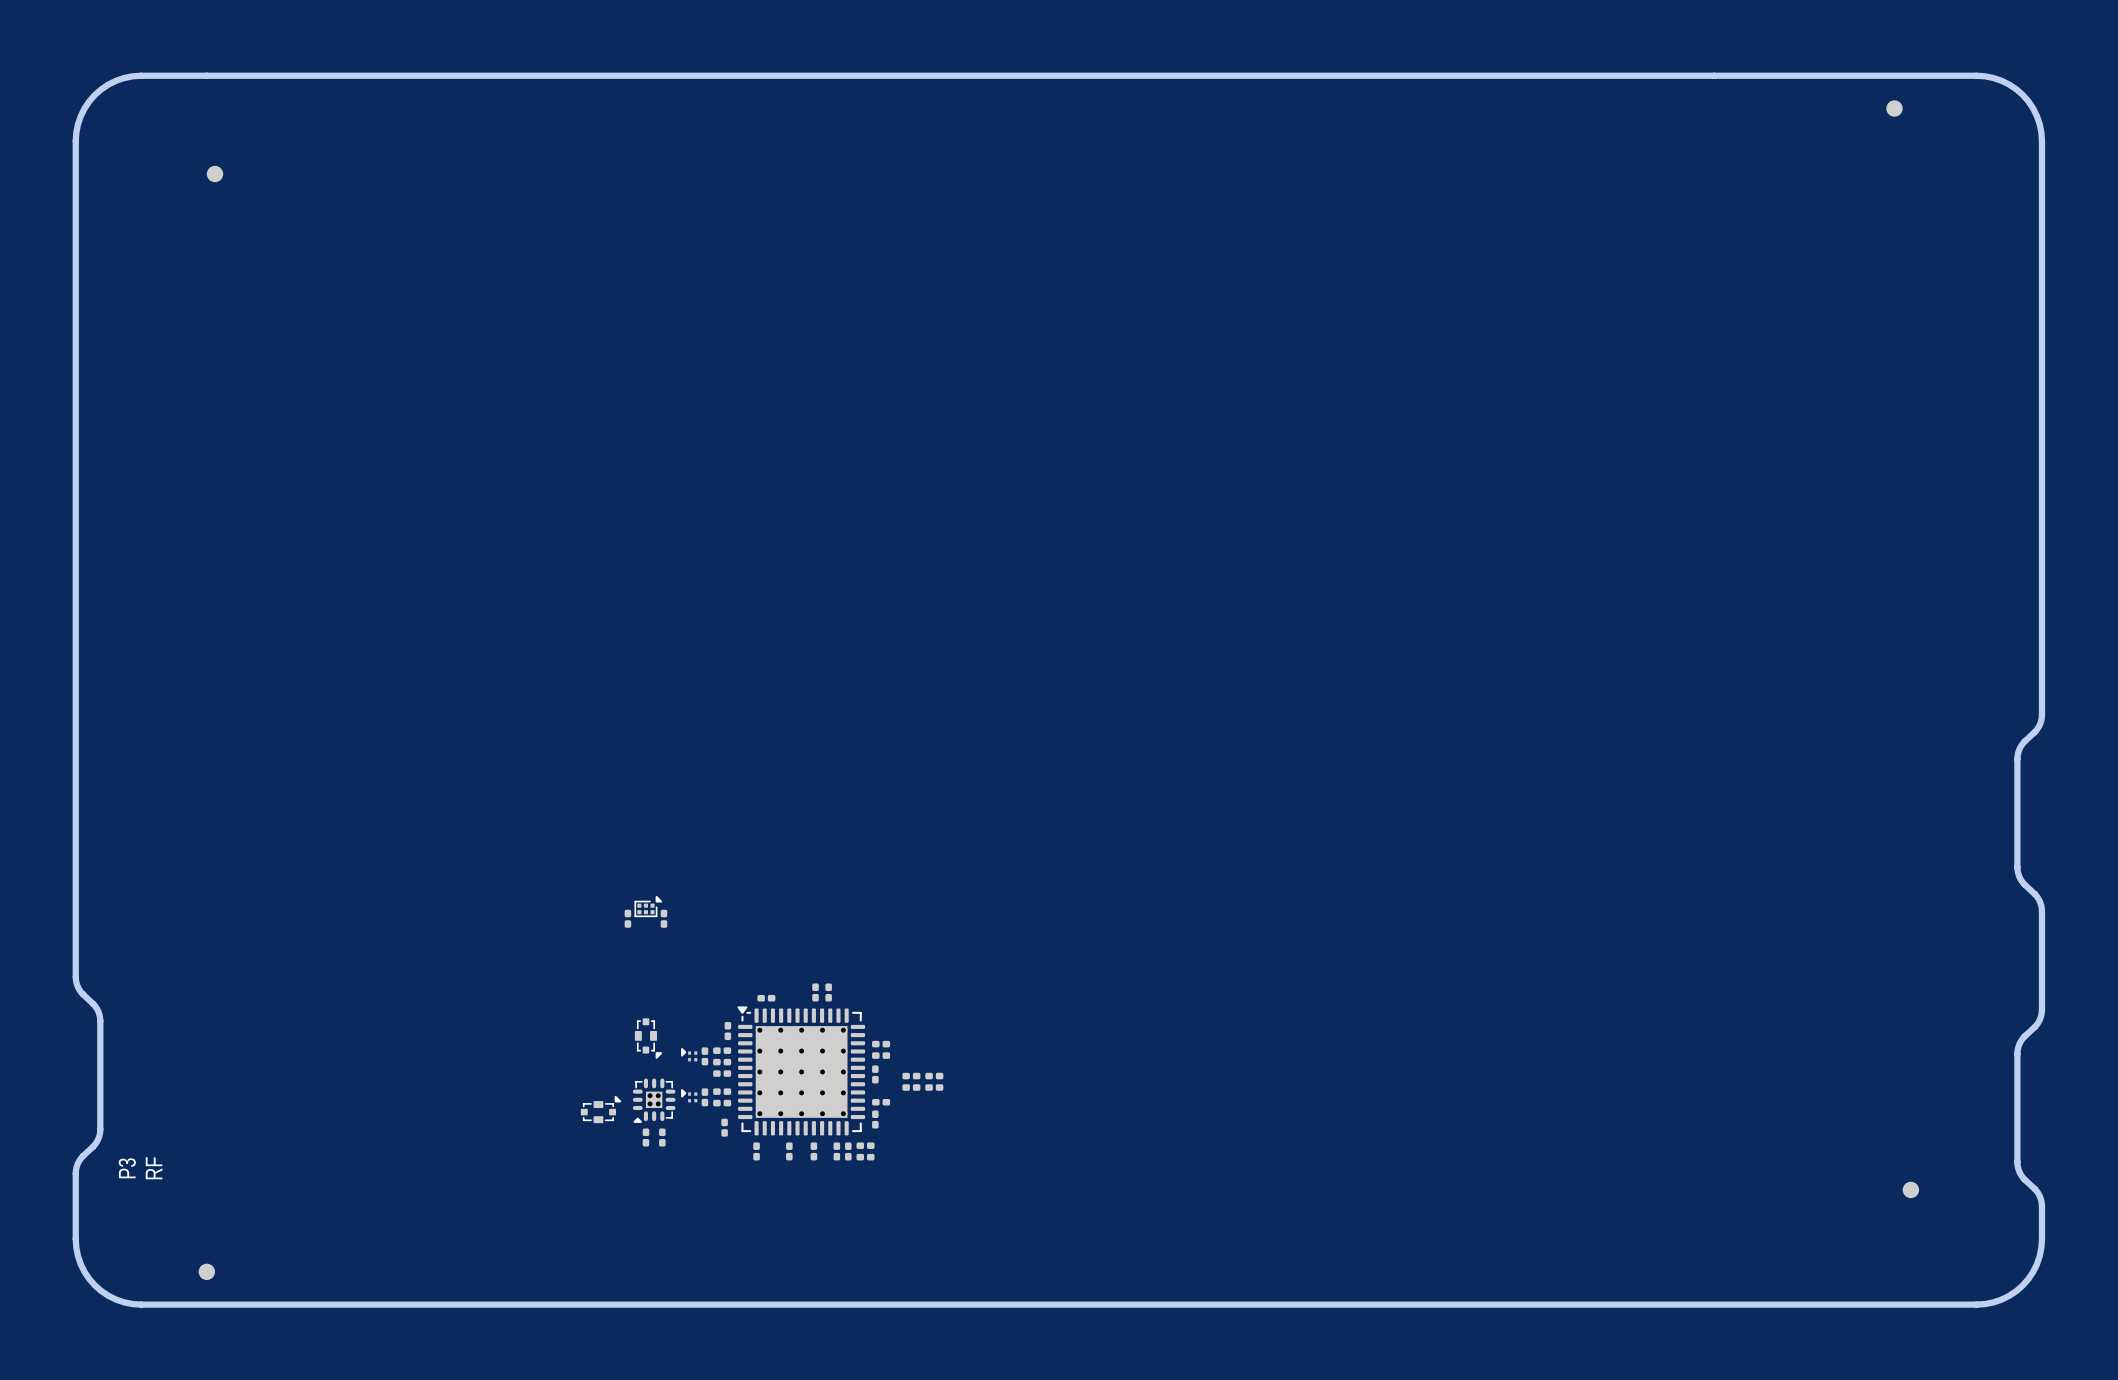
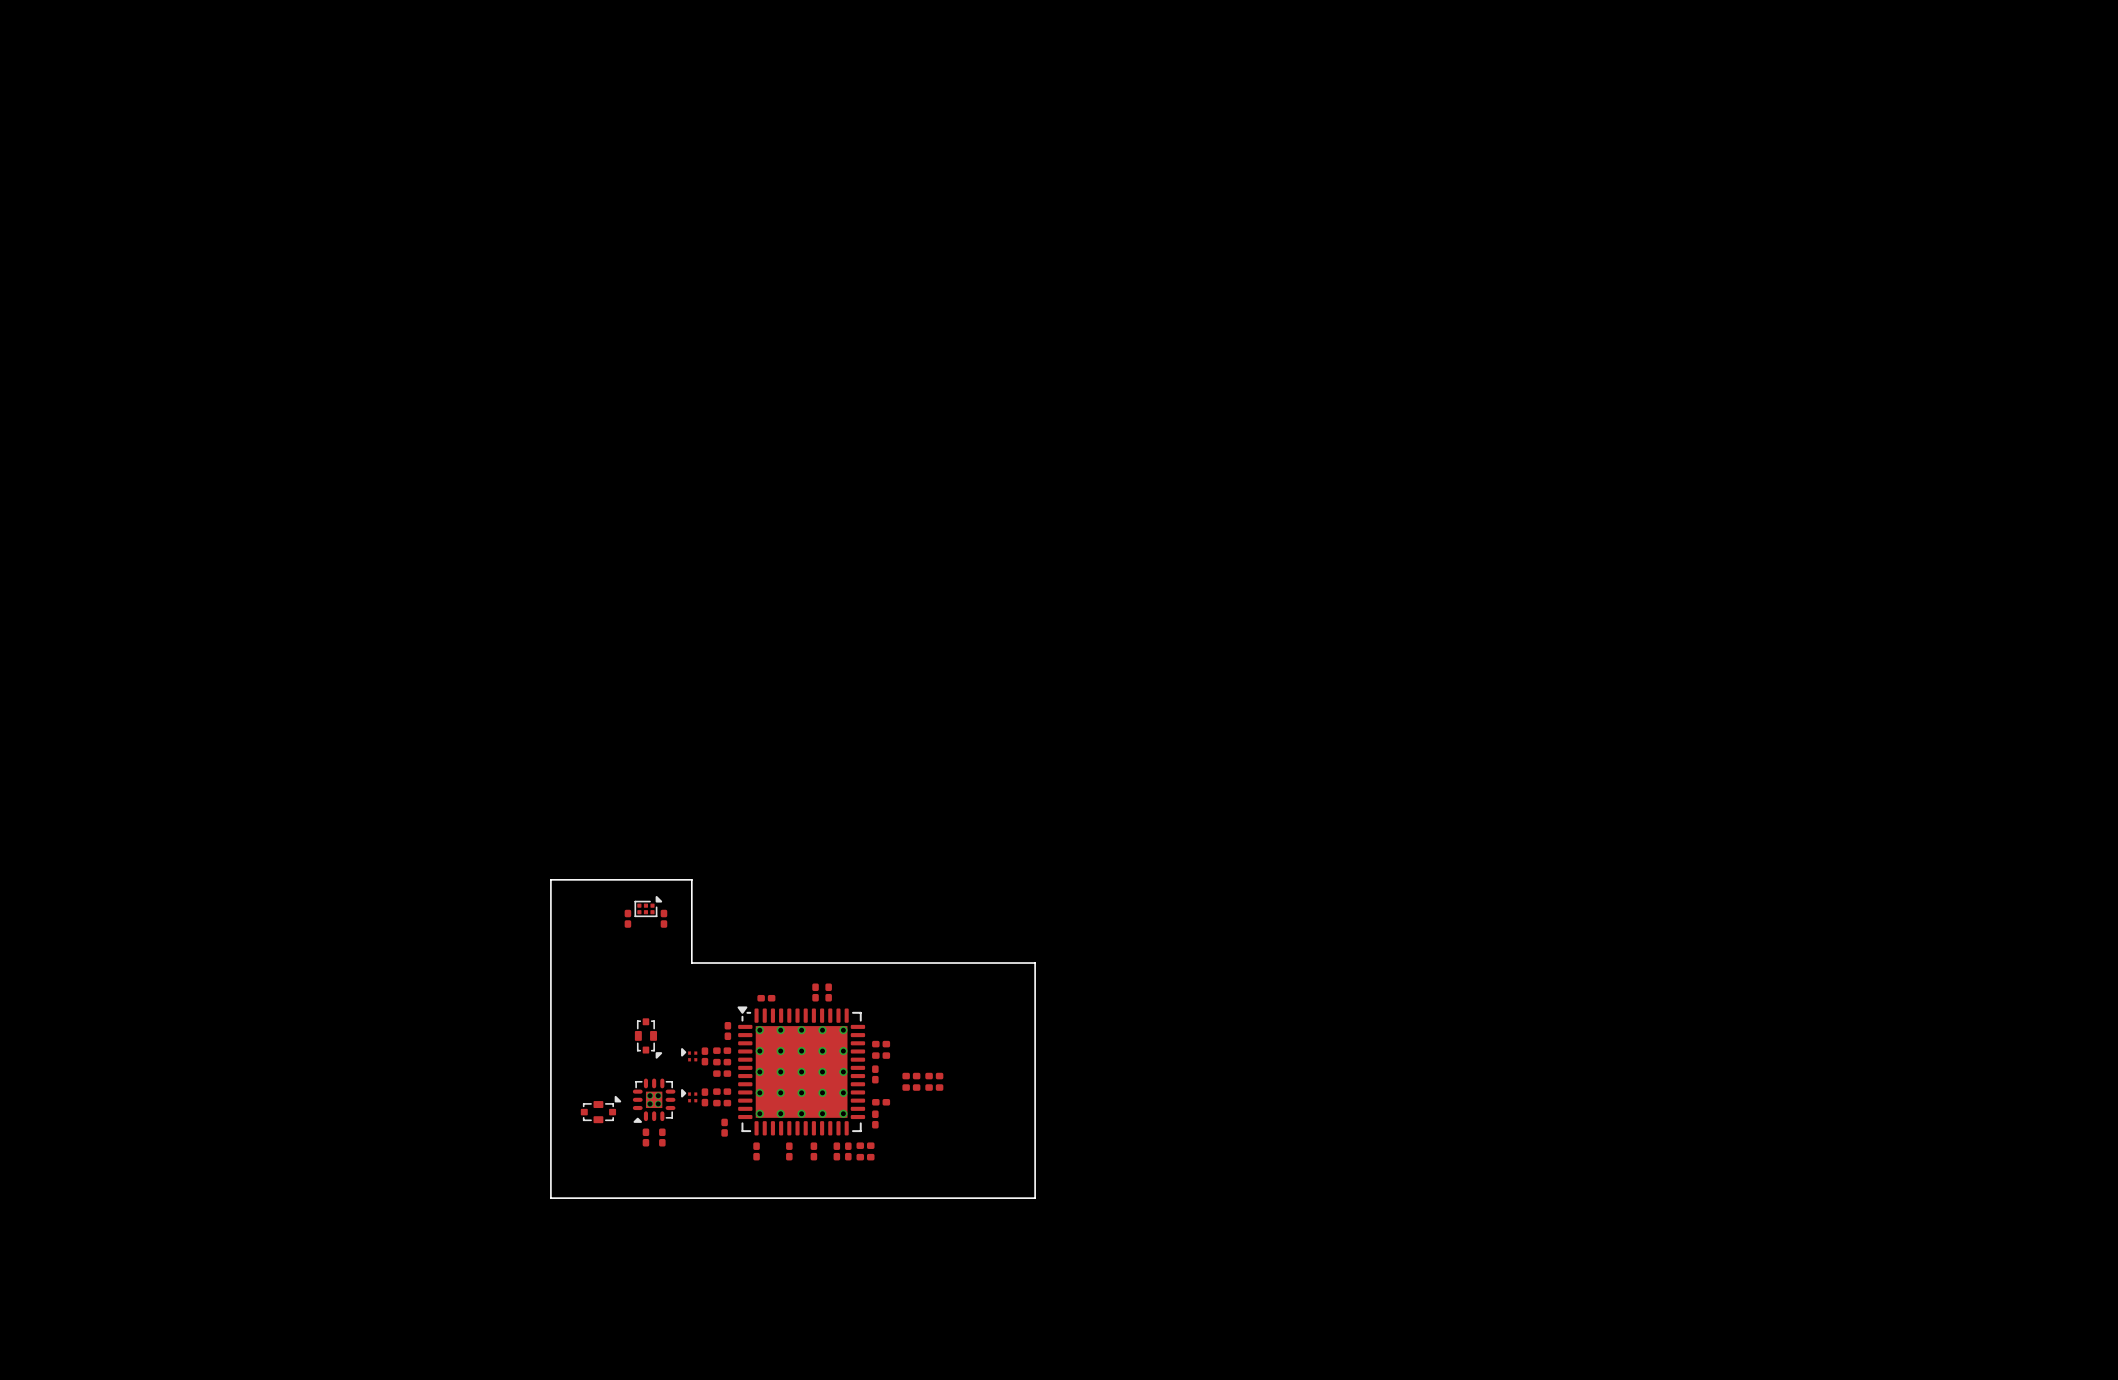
board edge: (141, 75) (1976, 75) (1993, 77) (2009, 84) (2022, 94) (2033, 108) (2039, 124) (2041, 141) (2041, 714) (2038, 727) (2020, 746) (2017, 759) (2017, 870) (2022, 882) (2038, 899) (2041, 911) (2041, 1012) (2036, 1024) (2020, 1041) (2017, 1053) (2017, 1165) (2022, 1177) (2038, 1194) (2041, 1203) (2041, 1247) (2033, 1271) (2022, 1285) (2009, 1295) (1993, 1302) (1976, 1304) (141, 1304) (124, 1302) (108, 1295) (94, 1285) (84, 1271) (77, 1256) (75, 1239) (76, 1167) (80, 1158) (97, 1141) (100, 1129) (100, 1017) (95, 1006) (79, 989) (75, 976) (75, 141) (80, 116) (94, 94) (116, 80) (141, 75) -> none
part: (1894, 108) -> none
part: (215, 174) -> none
board edge: none -> (550, 879) (691, 879) (691, 963) (1035, 963) (1035, 1198) (550, 1198) (550, 879)
text: P3 (127, 1168) -> none
text: RF (154, 1168) -> none
part: (1910, 1189) -> none
part: (206, 1271) -> none

